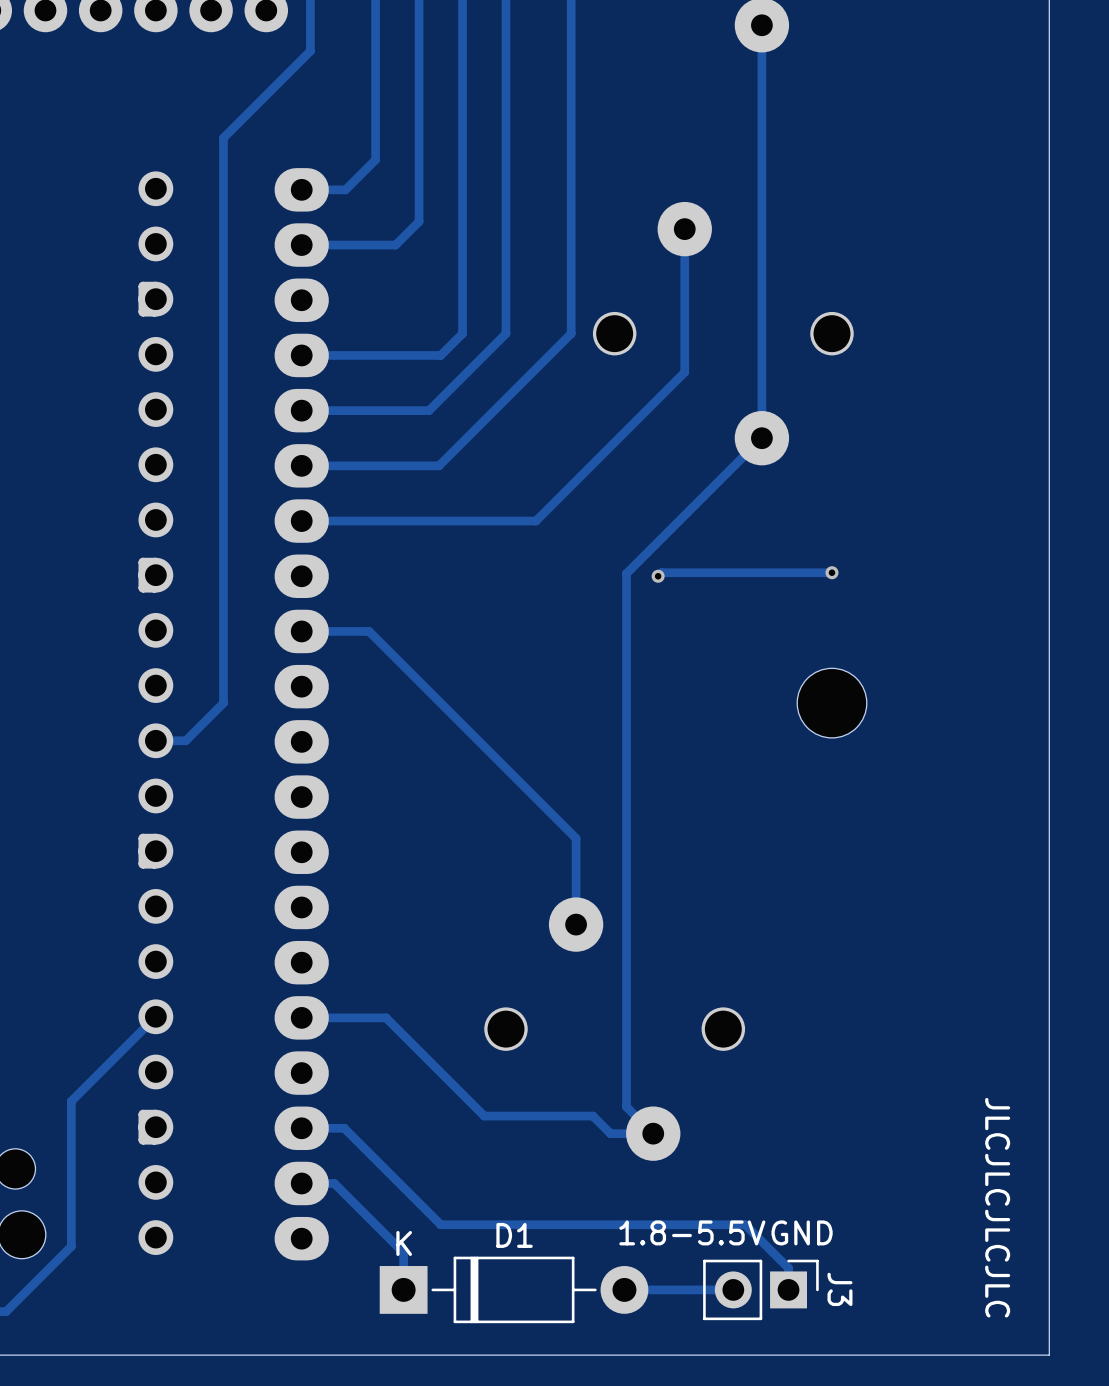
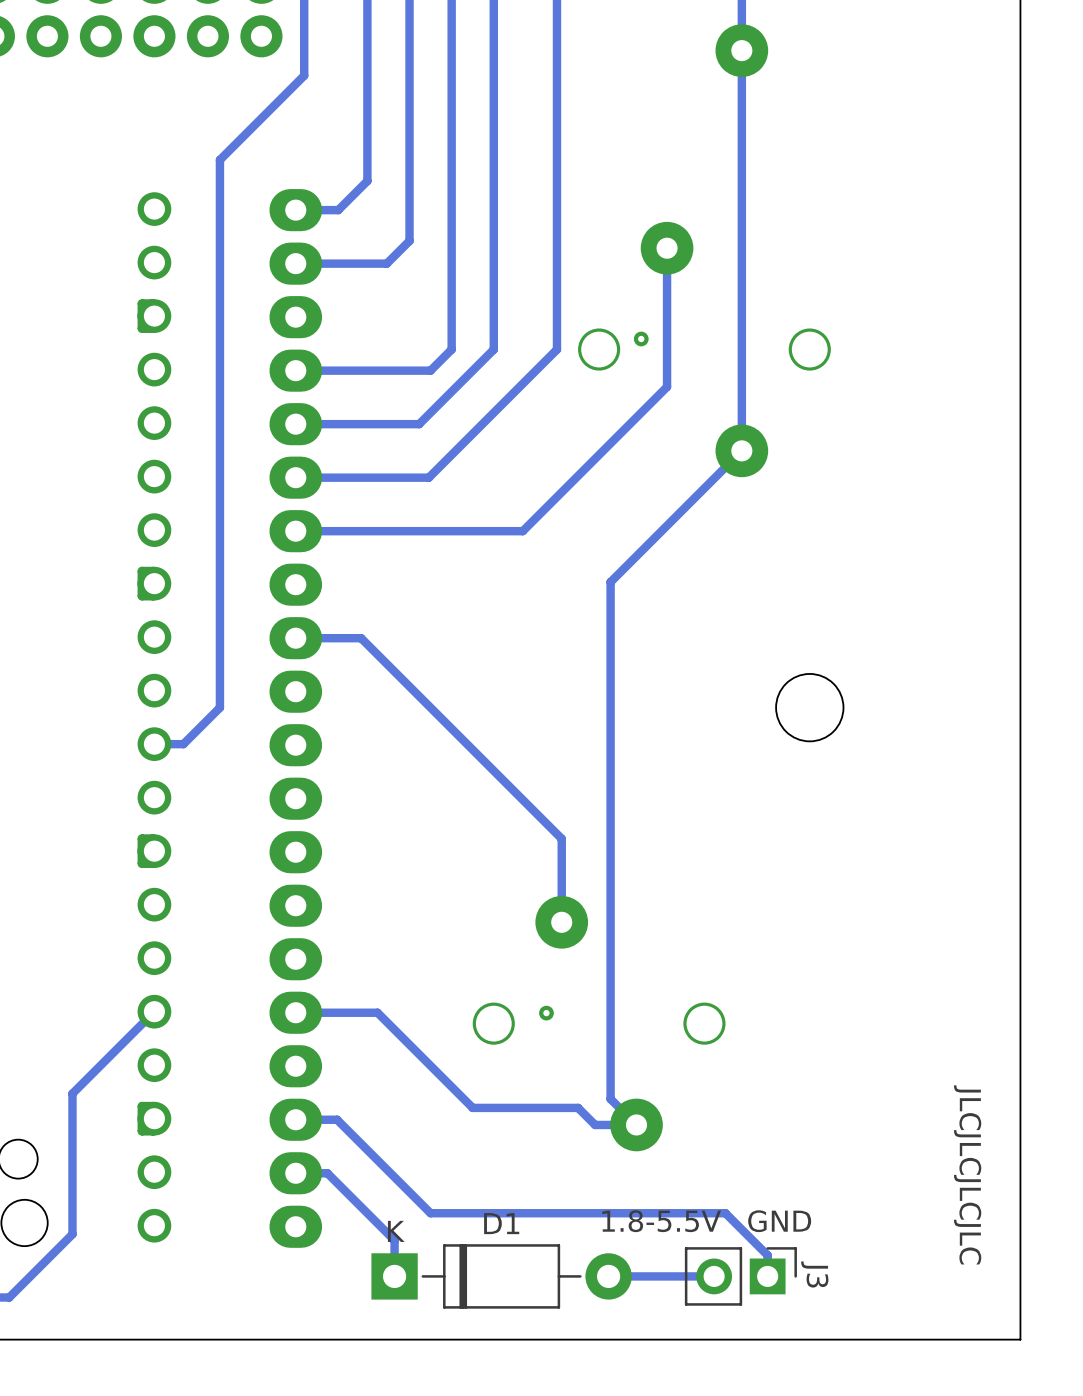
via: none -> (641, 339)
track: (832, 572) (661, 572) (658, 576) -> none
via: (832, 572) -> none
via: (658, 576) -> none
via: none -> (546, 1013)

